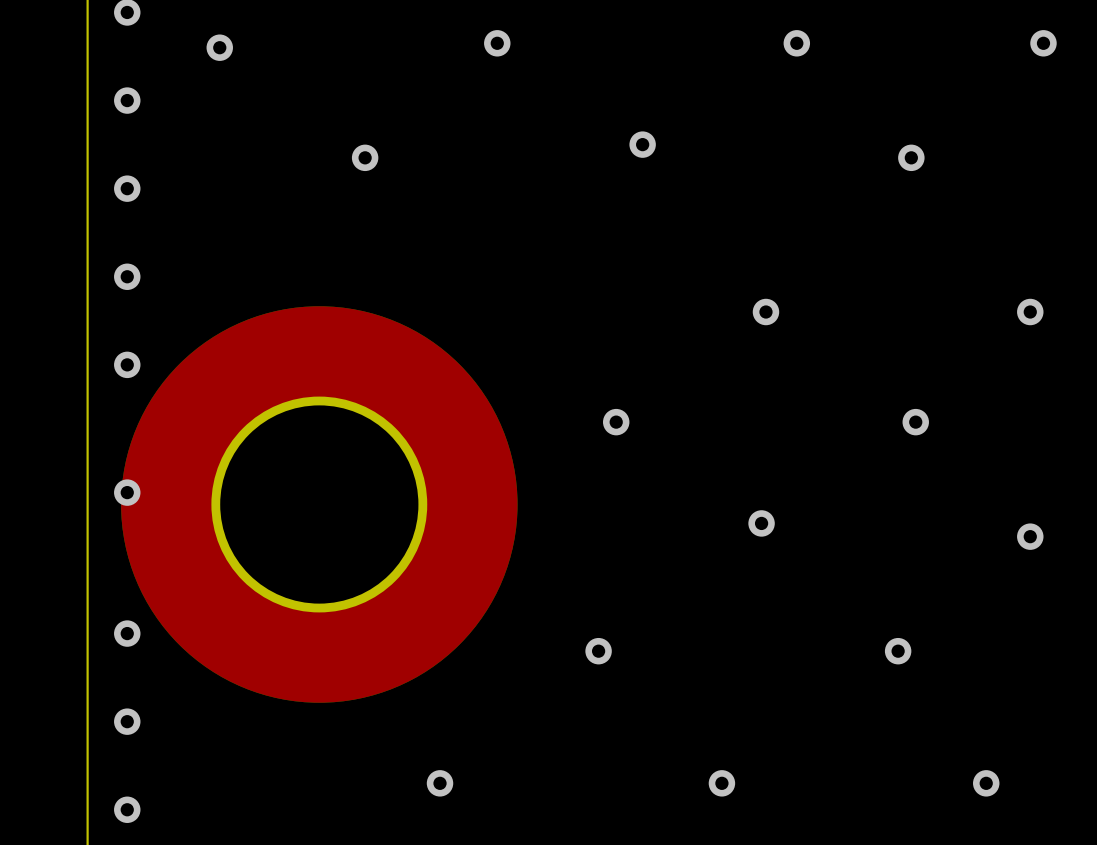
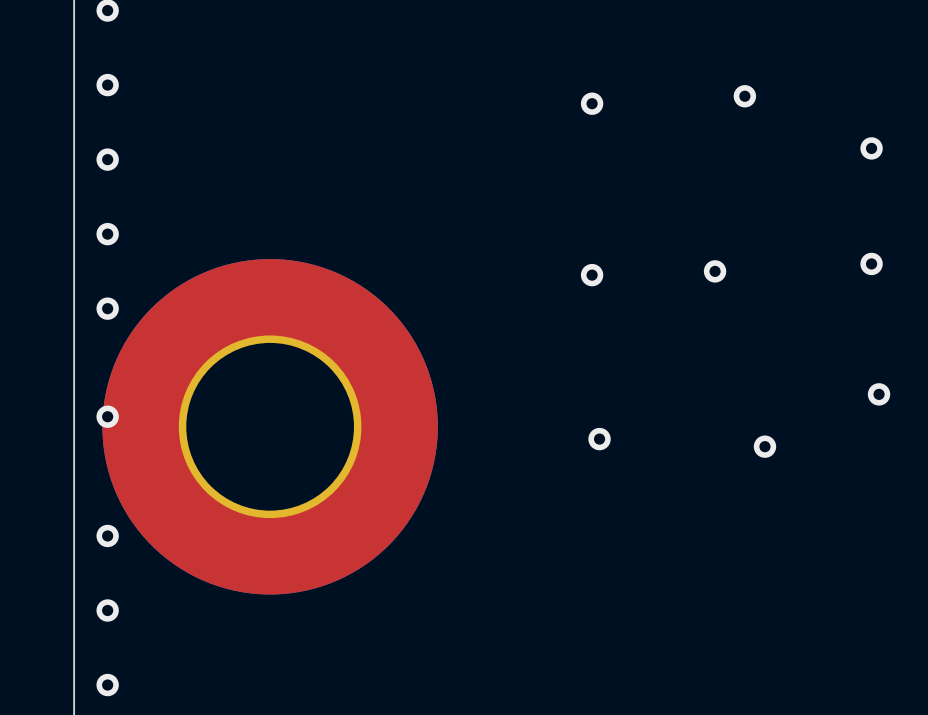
via: (497, 43) -> none
via: (796, 43) -> none
via: (1043, 43) -> none
via: (219, 47) -> none
via position: (642, 144) -> (592, 103)
via: (365, 157) -> none
via position: (911, 157) -> (744, 96)
via: none -> (871, 148)
via: (765, 312) -> none
via: none -> (715, 271)
via: none -> (592, 275)
via: (616, 422) -> none
via: (915, 422) -> none
via: none -> (879, 394)
via position: (761, 523) -> (599, 439)
via: none -> (764, 446)
via: (1030, 536) -> none
via: (598, 651) -> none
via: (898, 651) -> none
via: (440, 783) -> none
via: (721, 783) -> none
via: (986, 783) -> none

